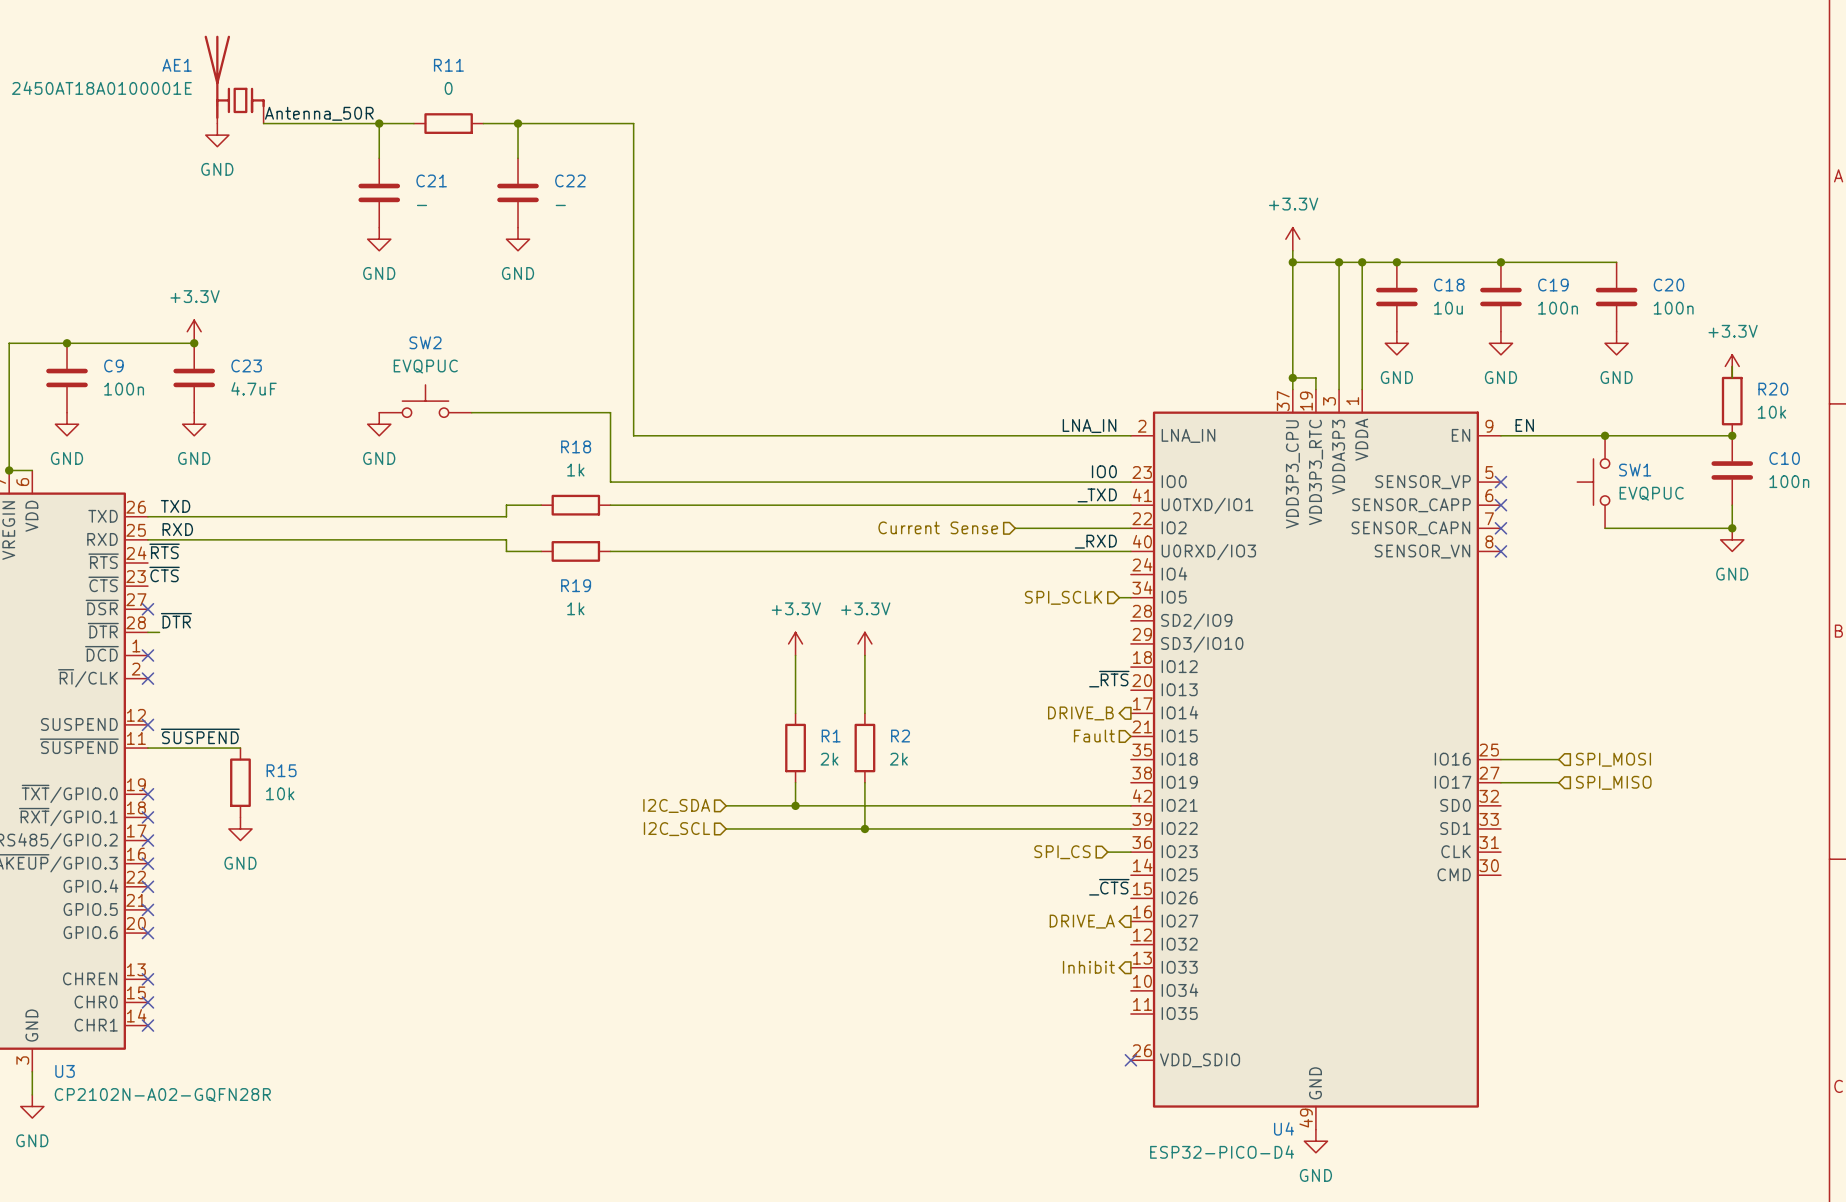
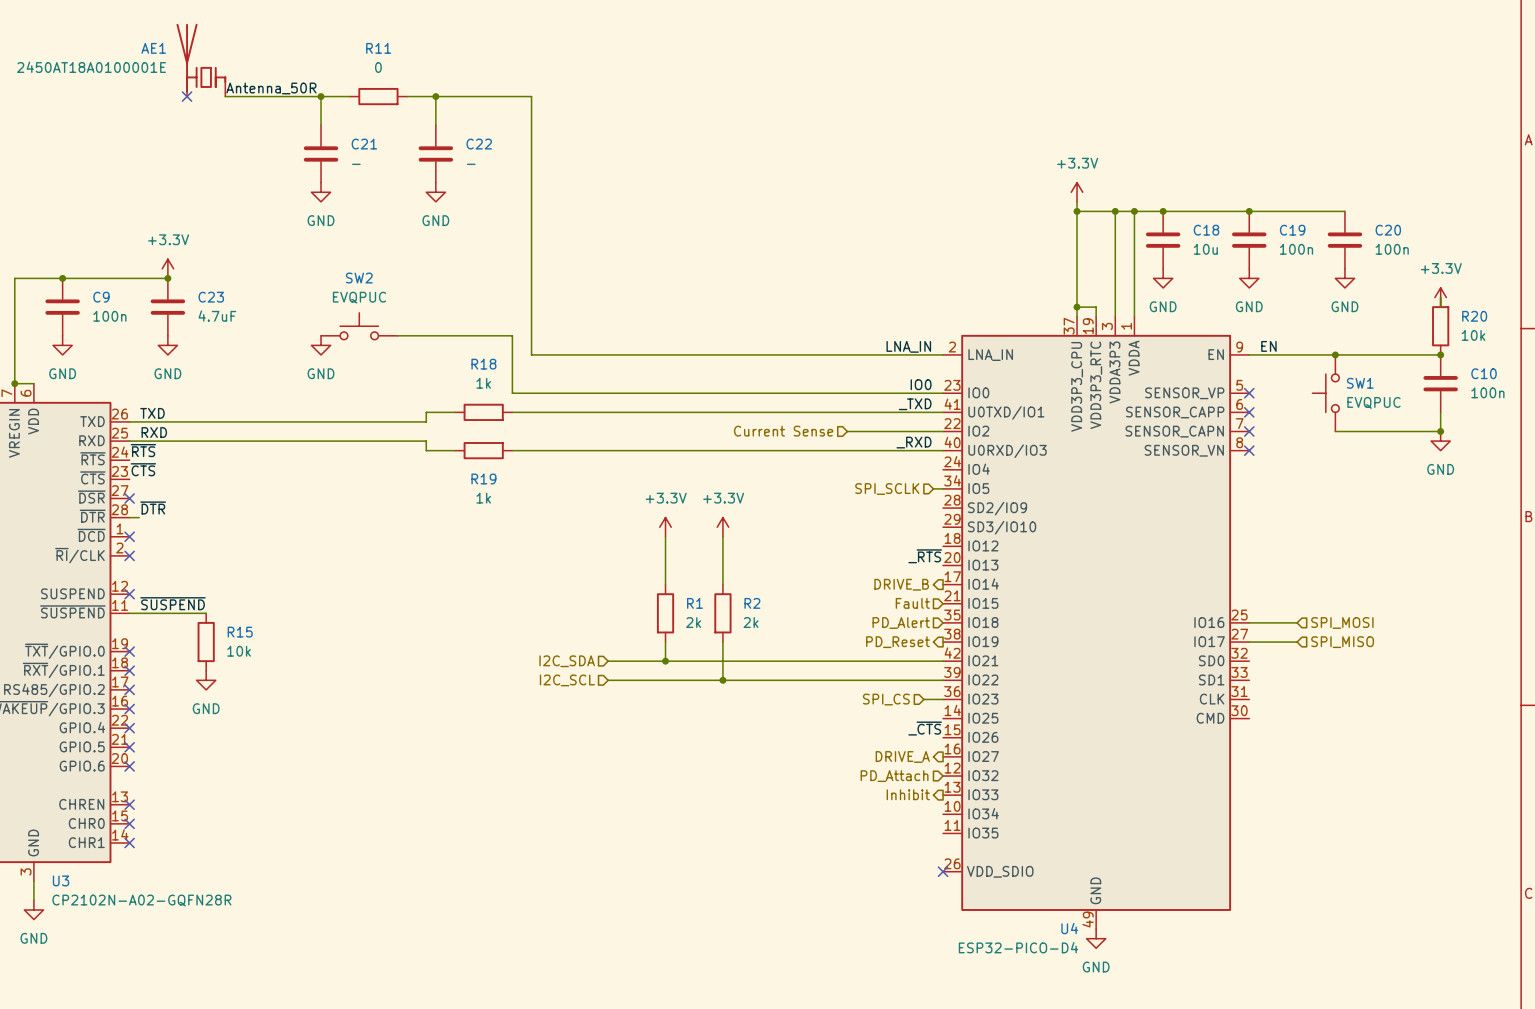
no-connect mark: none -> (187, 96)
power symbol: GND (217, 135) -> none
hierarchical label: none -> PD_Alert (901, 623)
hierarchical label: none -> PD_Reset (898, 642)
hierarchical label: none -> PD_Attach (894, 776)

